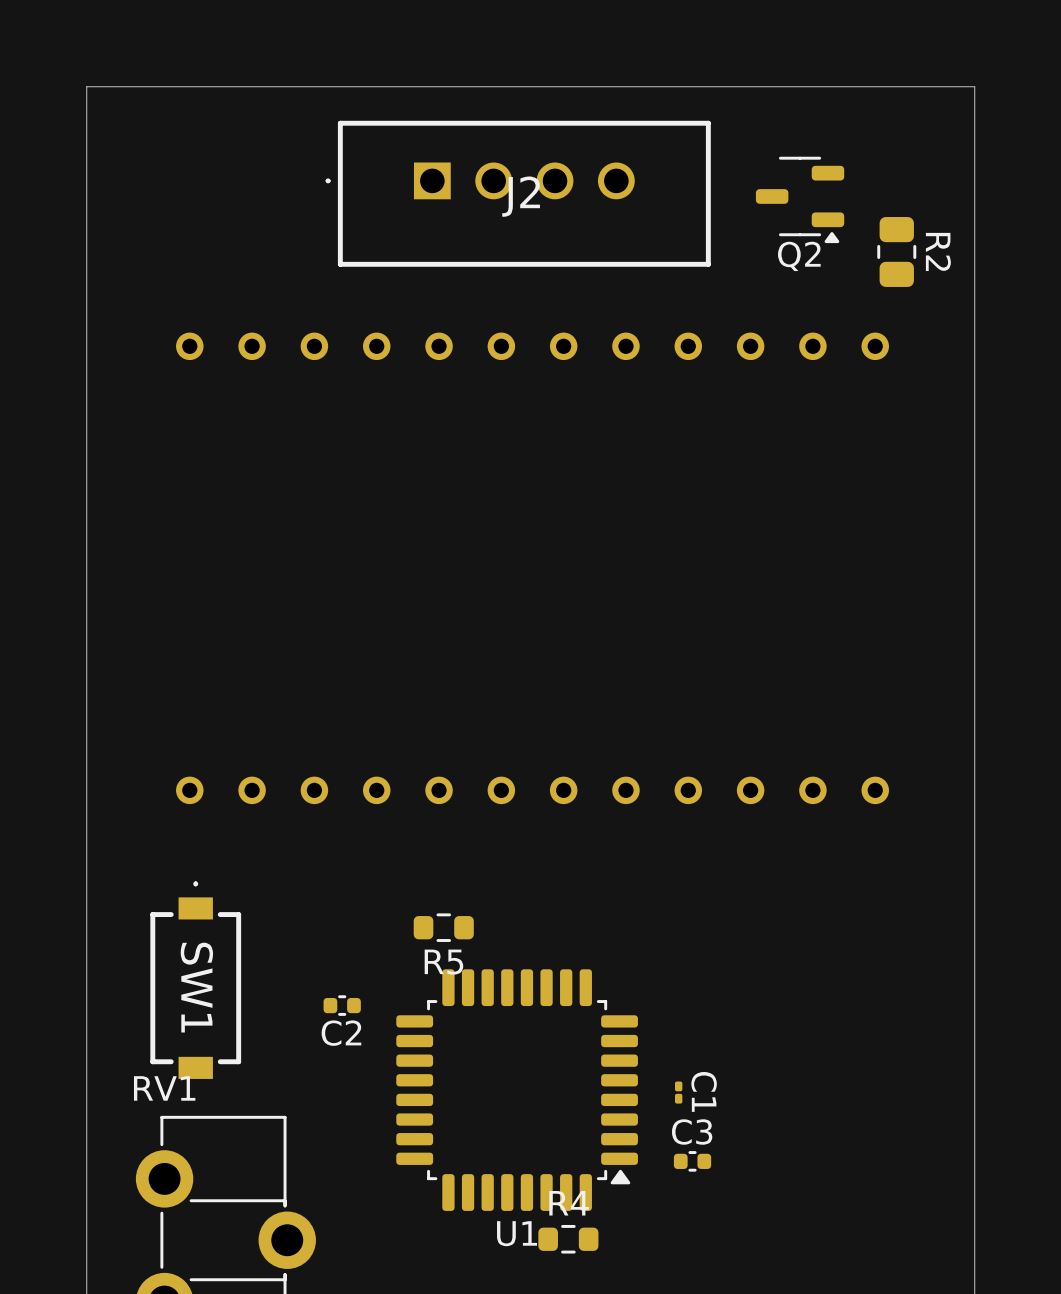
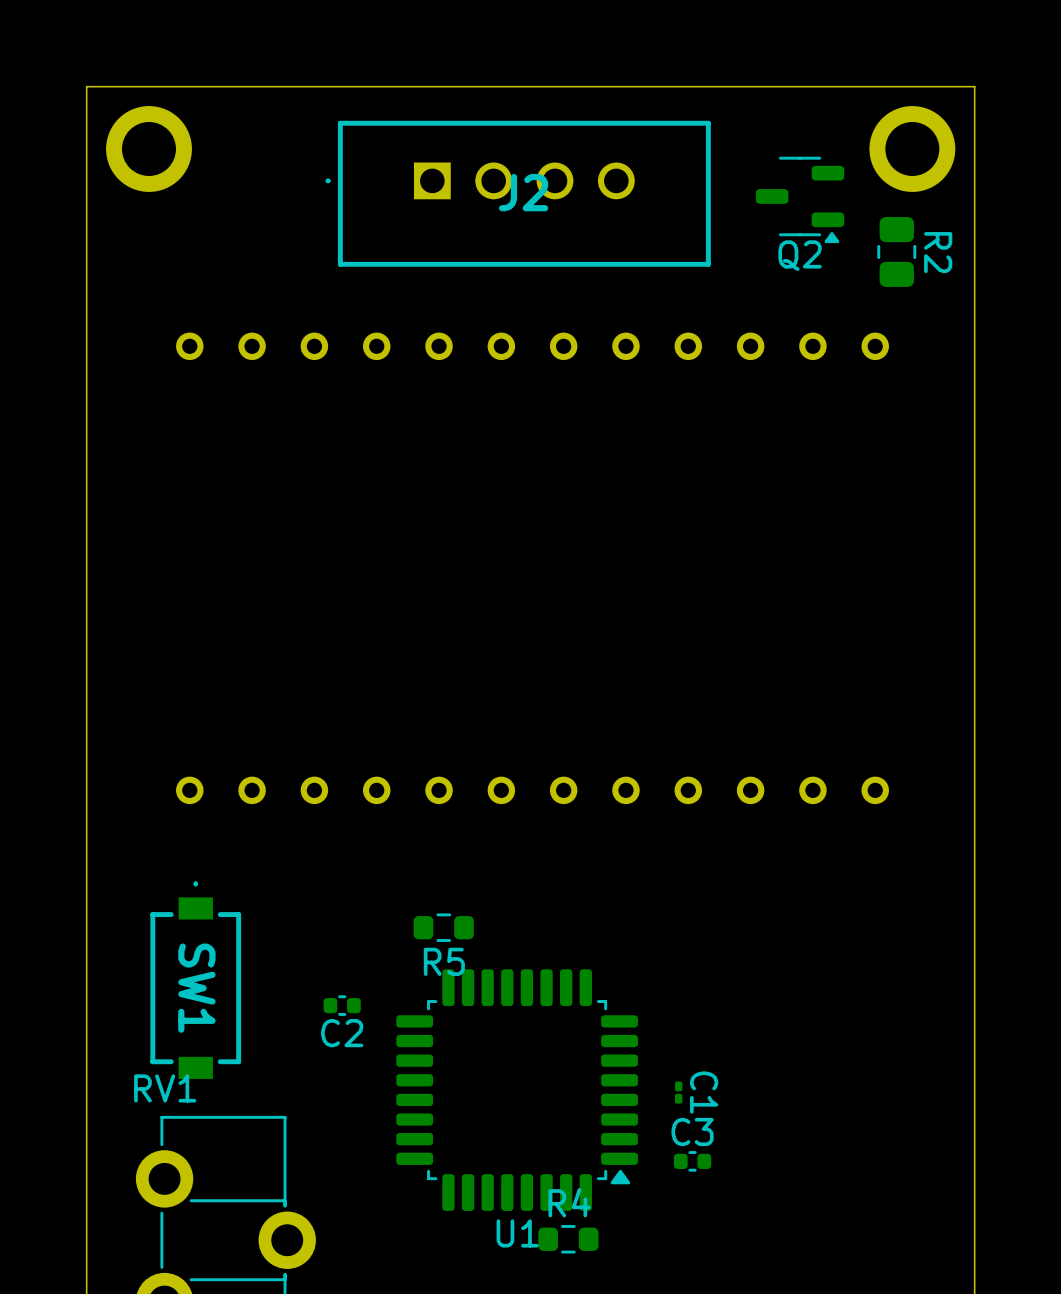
part: none -> (149, 149)
part: none -> (912, 149)

